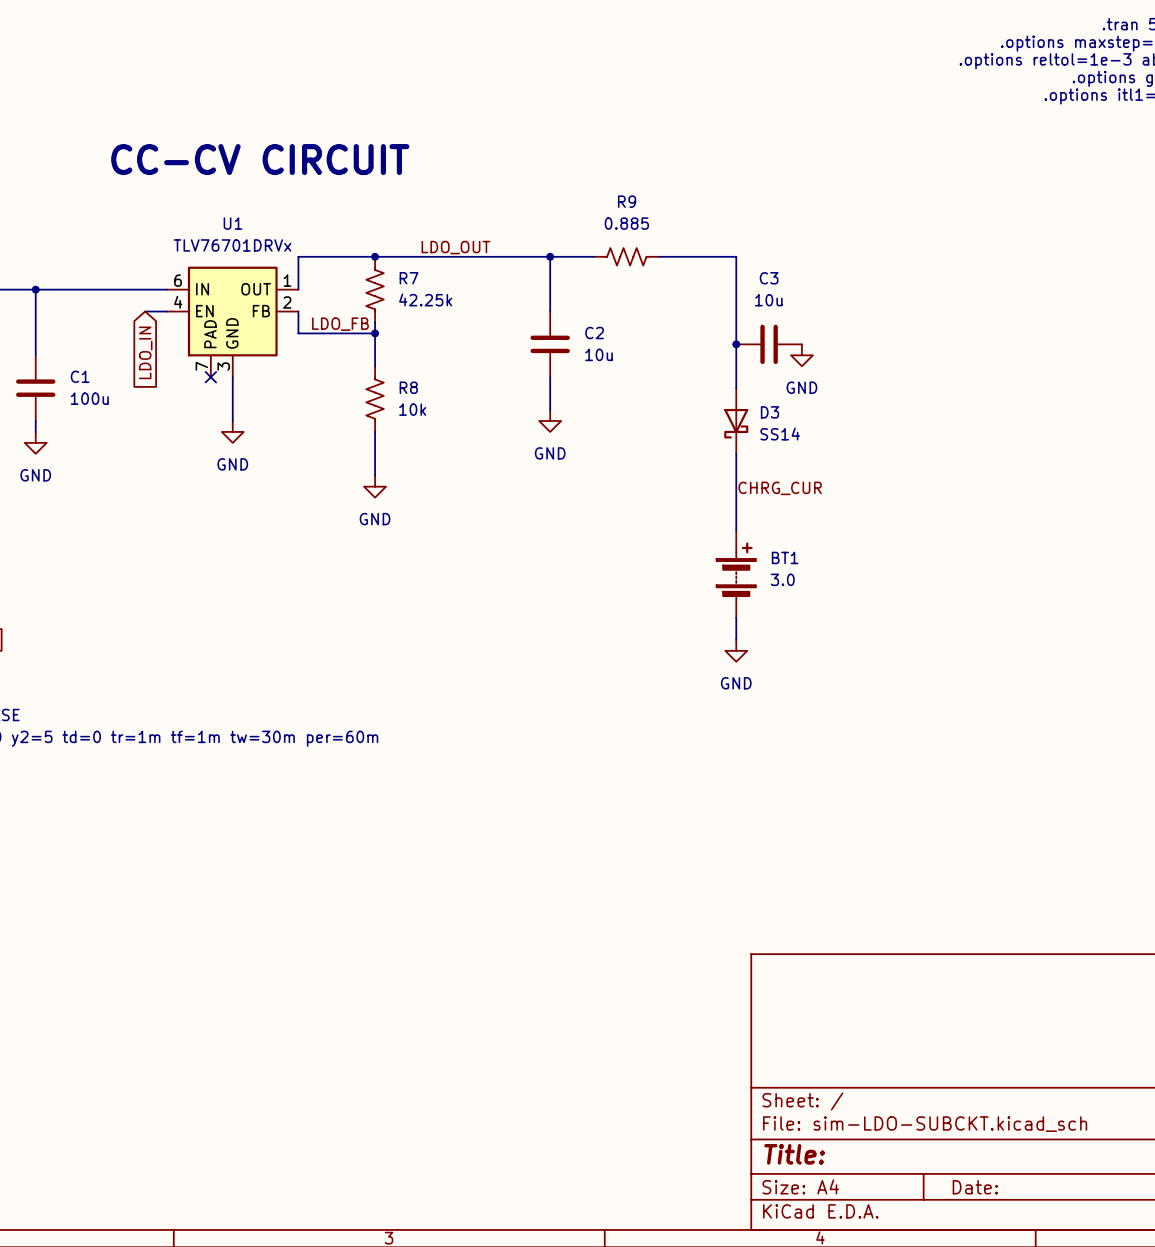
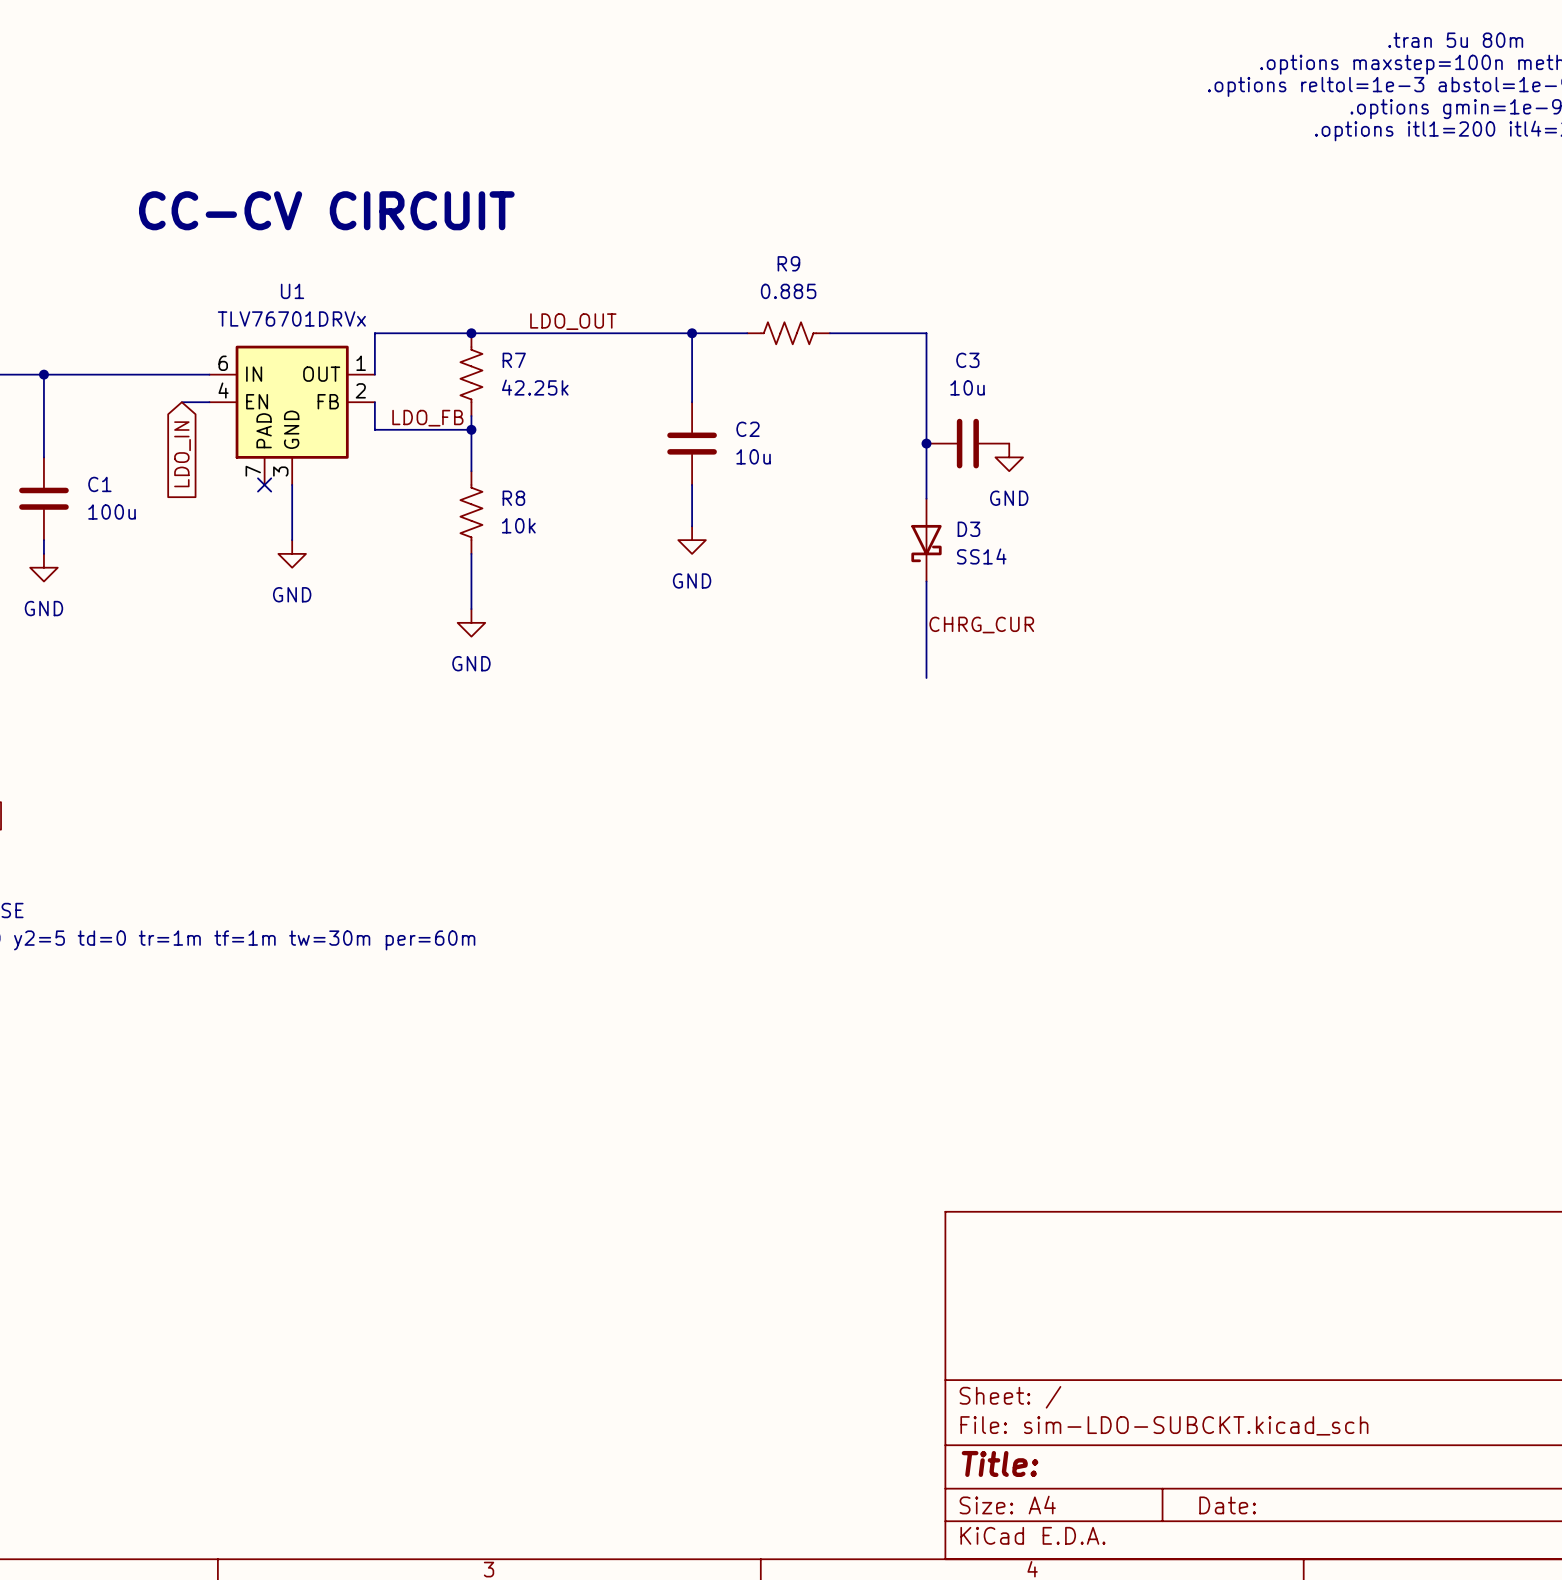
BT1: 3.0 (736, 574) -> none
wire: (736, 618) (736, 639) -> none
power symbol: GND (736, 650) -> none

